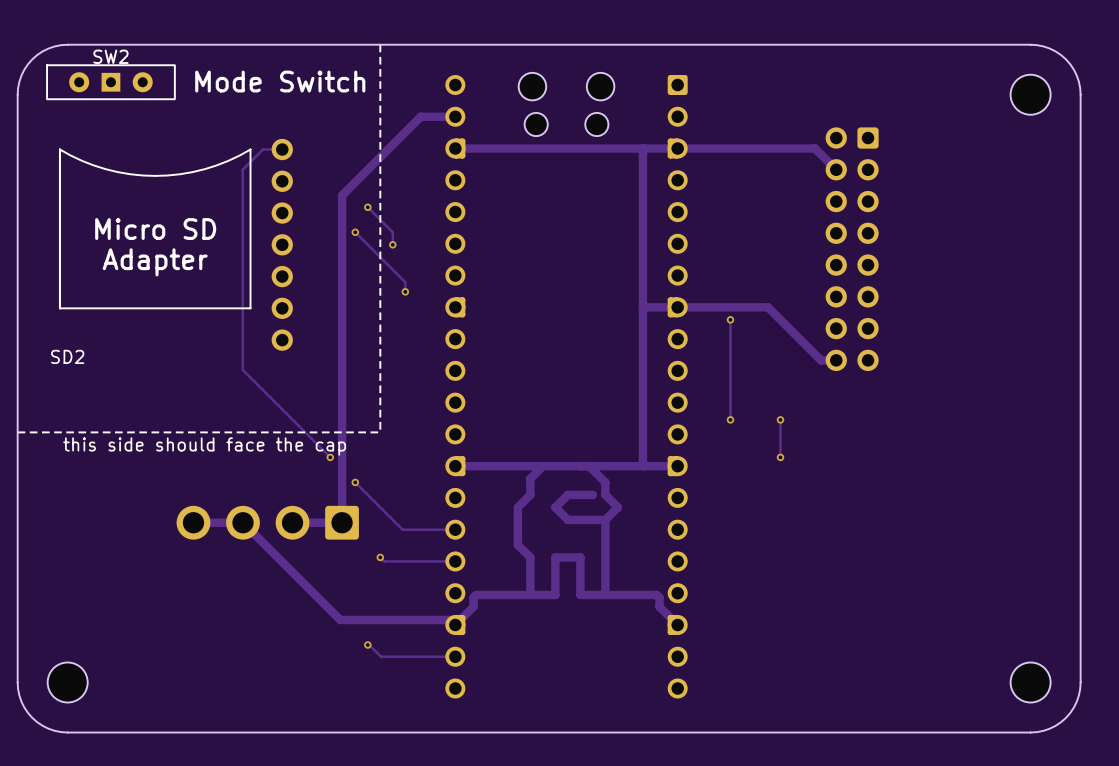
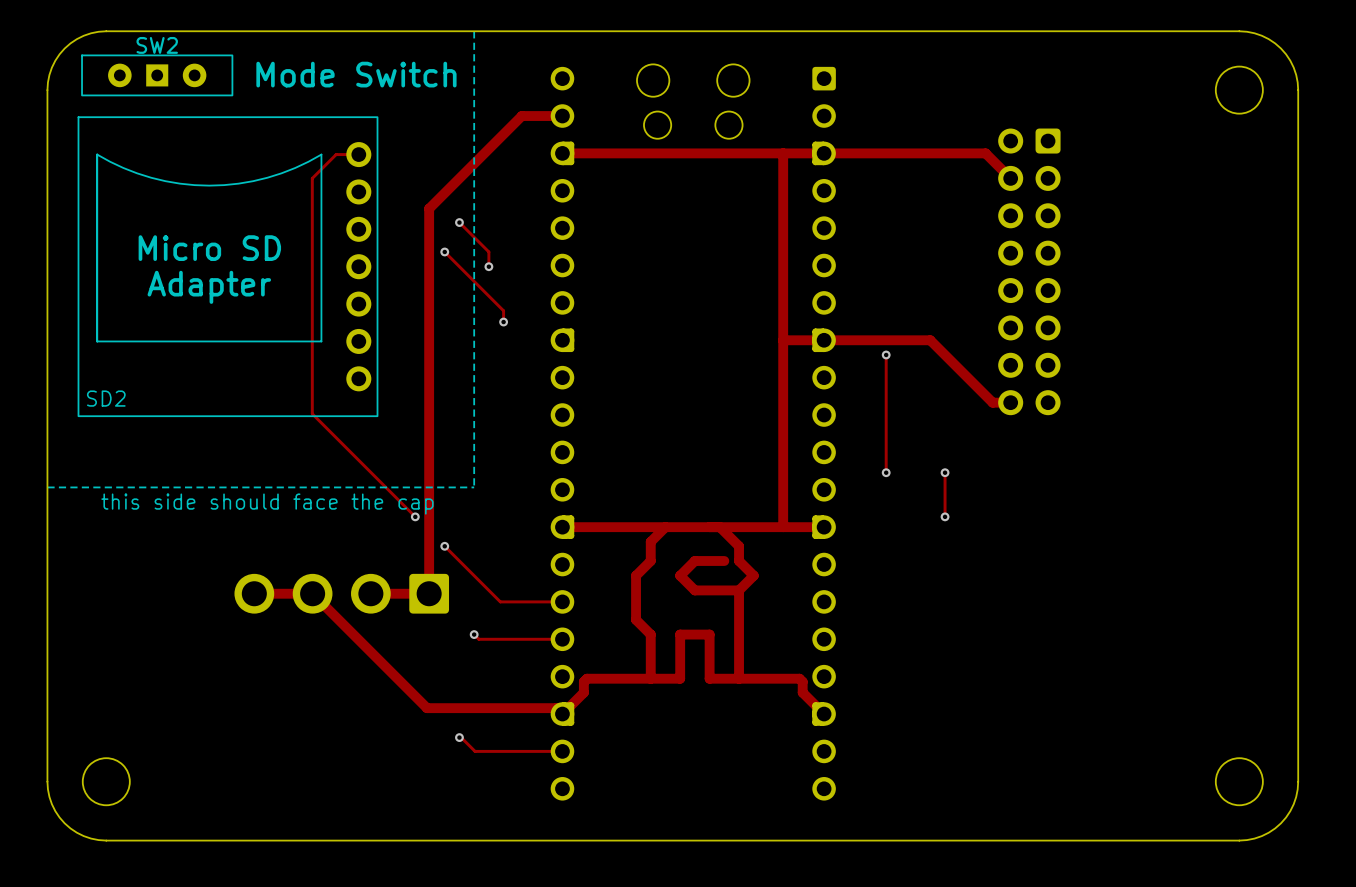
SD2 footprint: [59, 138, 293, 351] -> [77, 116, 379, 417]

